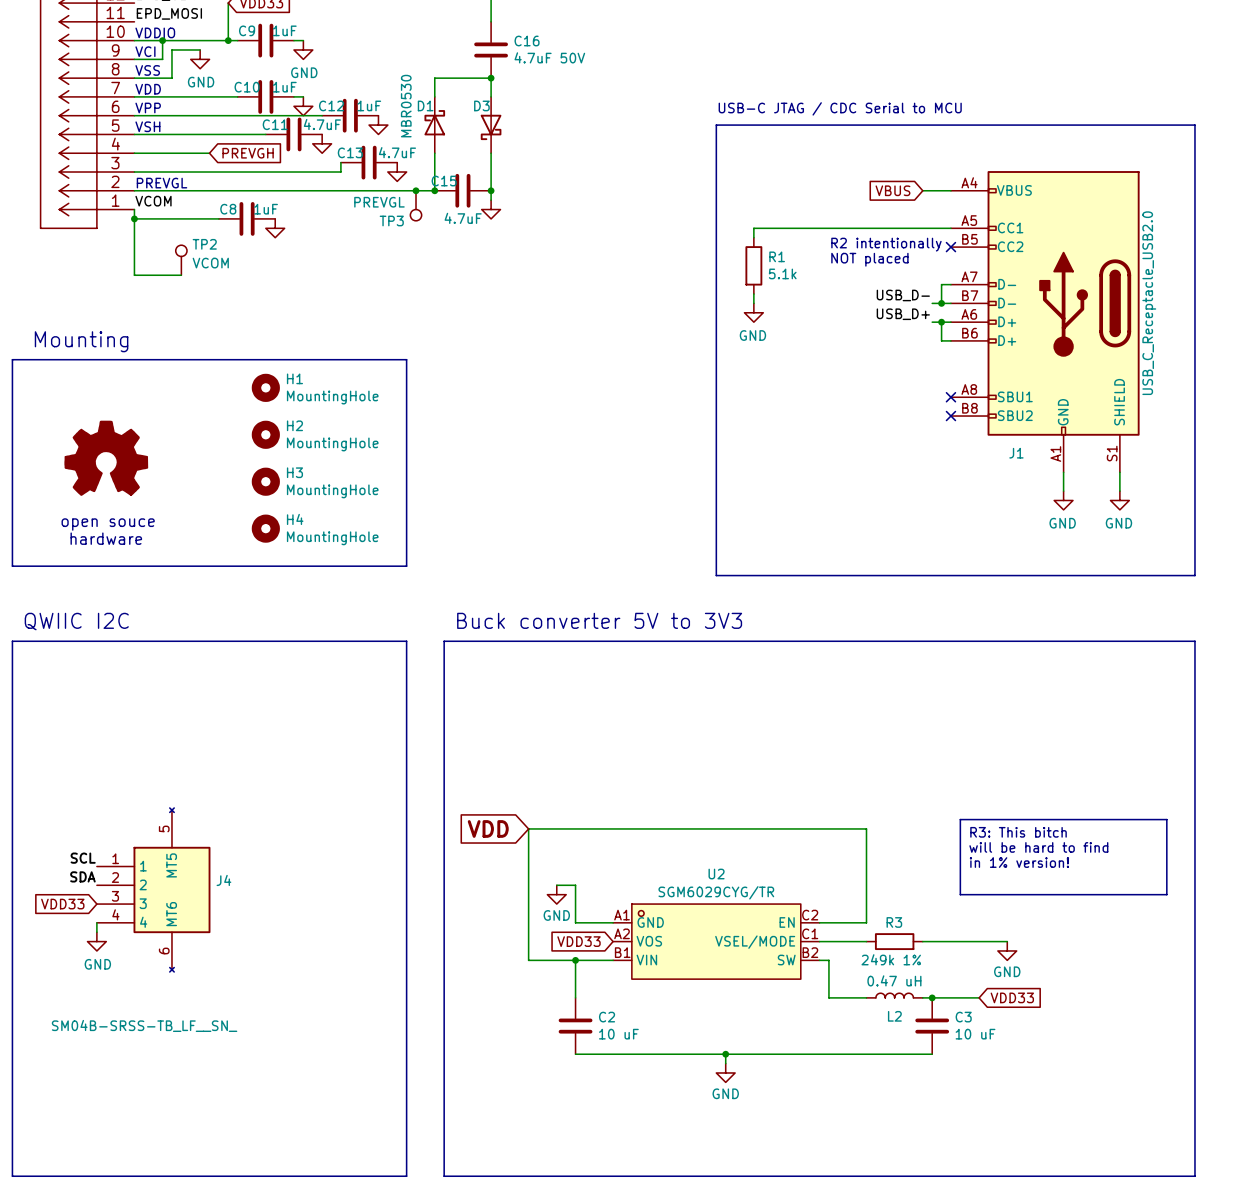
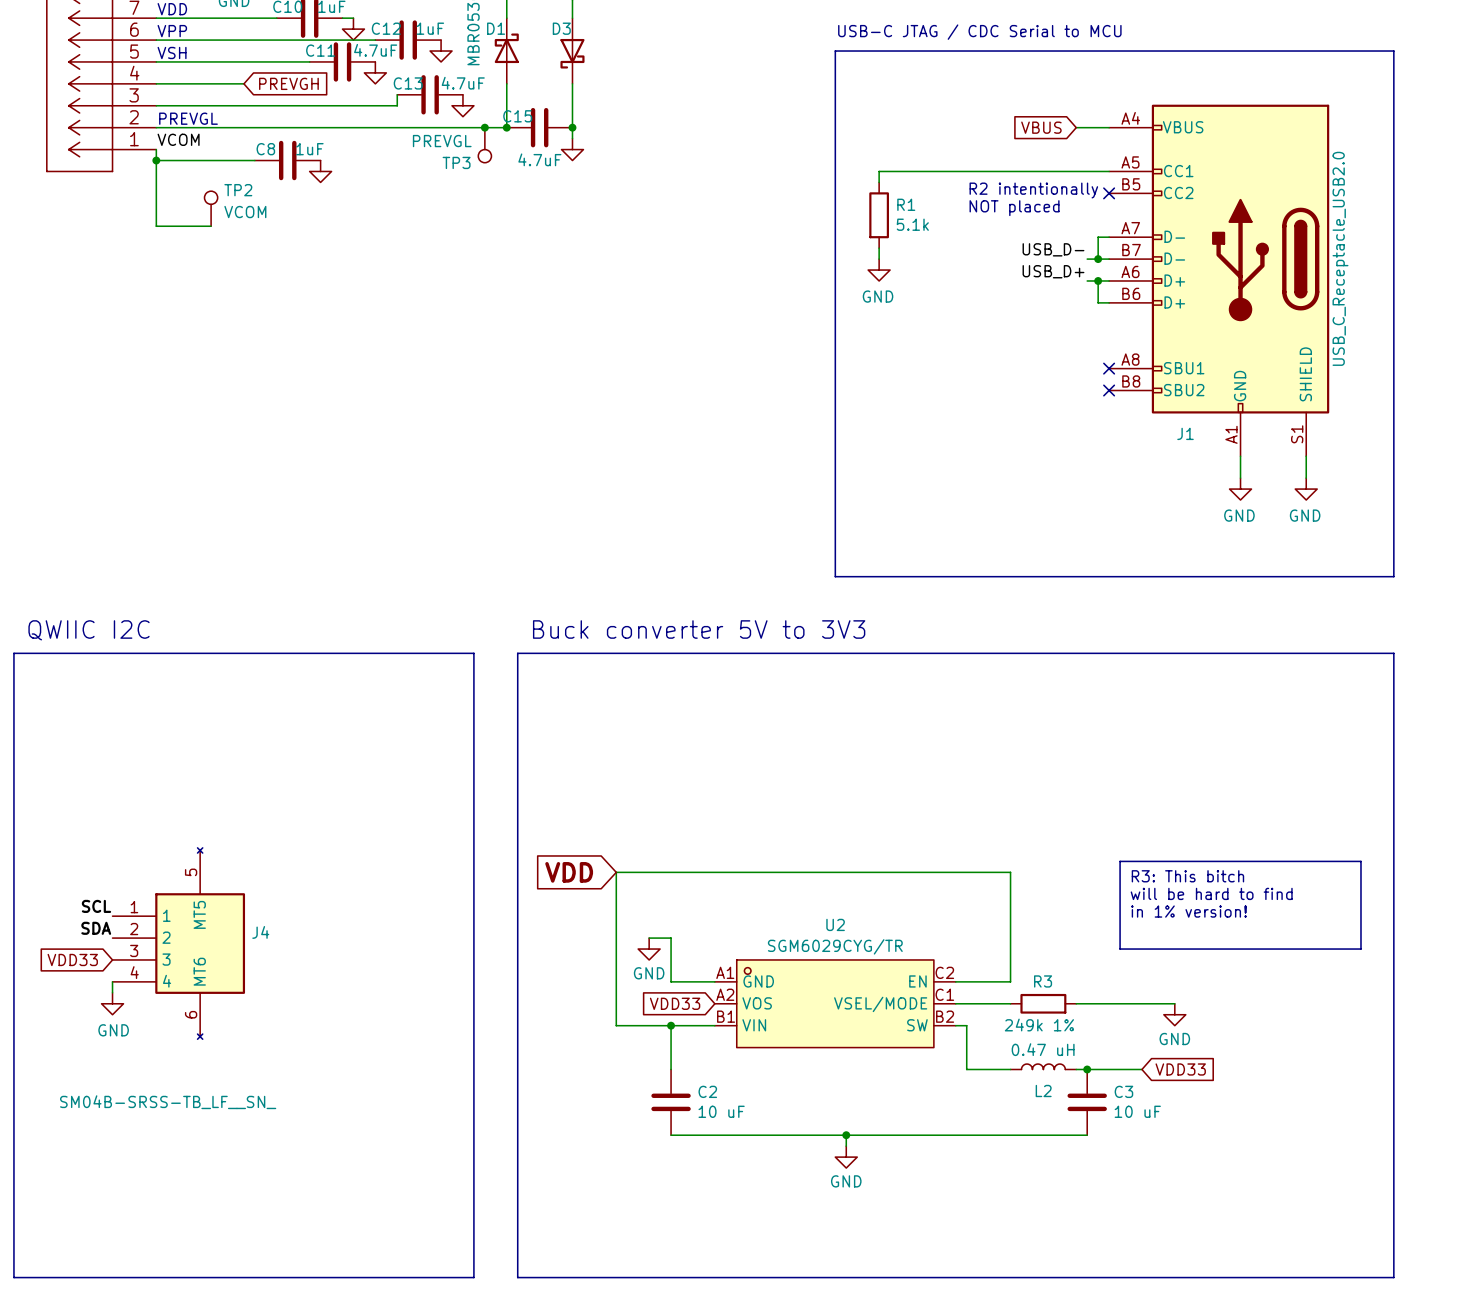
text: Mounting (81, 341) -> none
line: (12, 359) (406, 359) (406, 566) (12, 566) (12, 359) -> none
H1: MountingHole (265, 387) -> none
H2: MountingHole (265, 434) -> none
power symbol: (106, 458) -> none
H3: MountingHole (265, 481) -> none
text: open souce (108, 524) -> none
H4: MountingHole (265, 528) -> none
text: hardware (106, 538) -> none

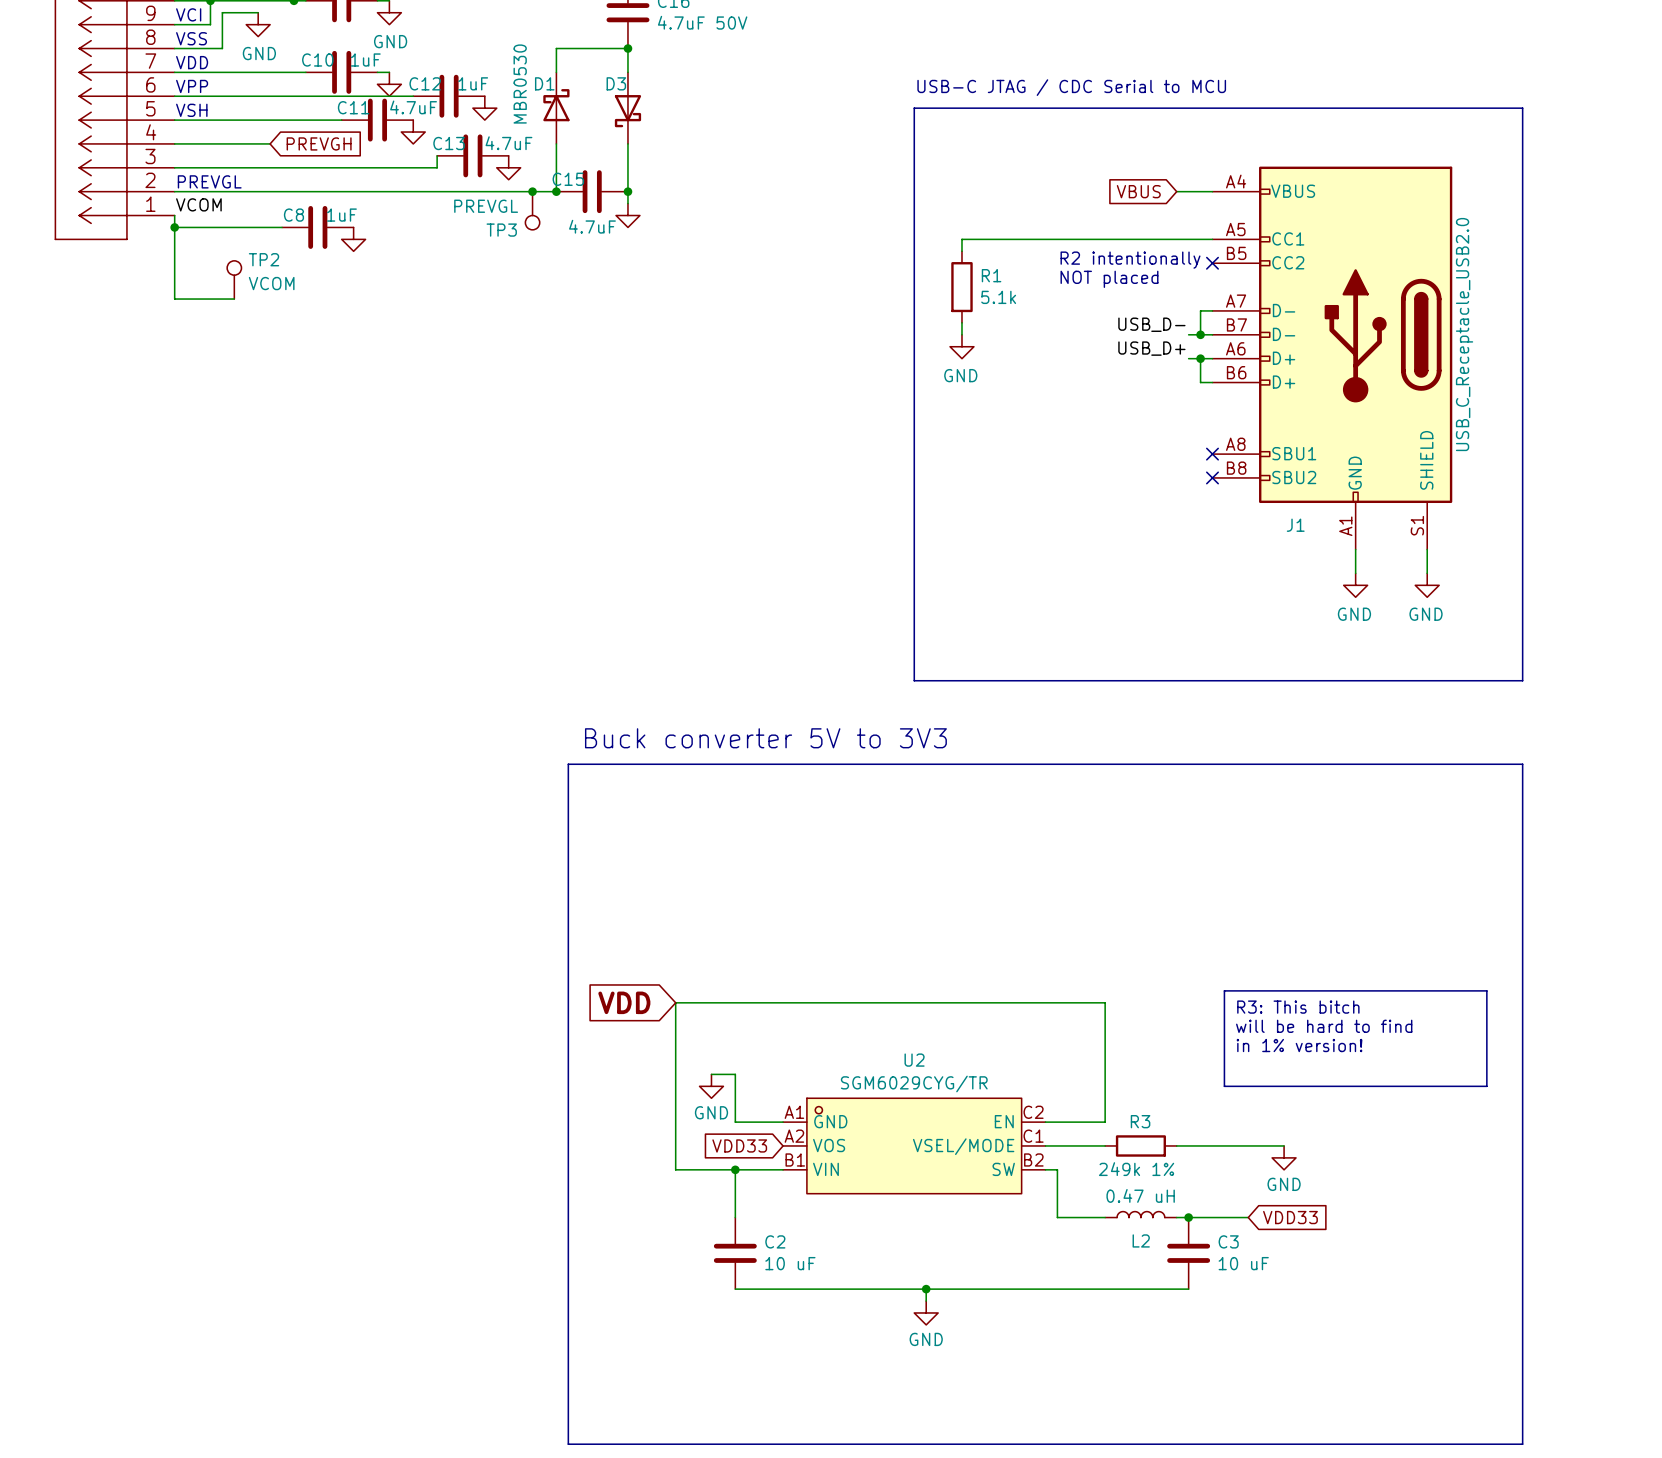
text: QWIIC I2C (89, 630) -> none
line: (13, 653) (473, 653) (473, 1277) (13, 1277) (13, 653) -> none
label: SCL (96, 906) -> none
label: SDA (96, 928) -> none
J4: SM04B-SRSS-TB_LF__SN_ (178, 943) -> none
global label: VDD33 (72, 959) -> none
wire: (112, 981) (112, 992) -> none
power symbol: GND (112, 1003) -> none

